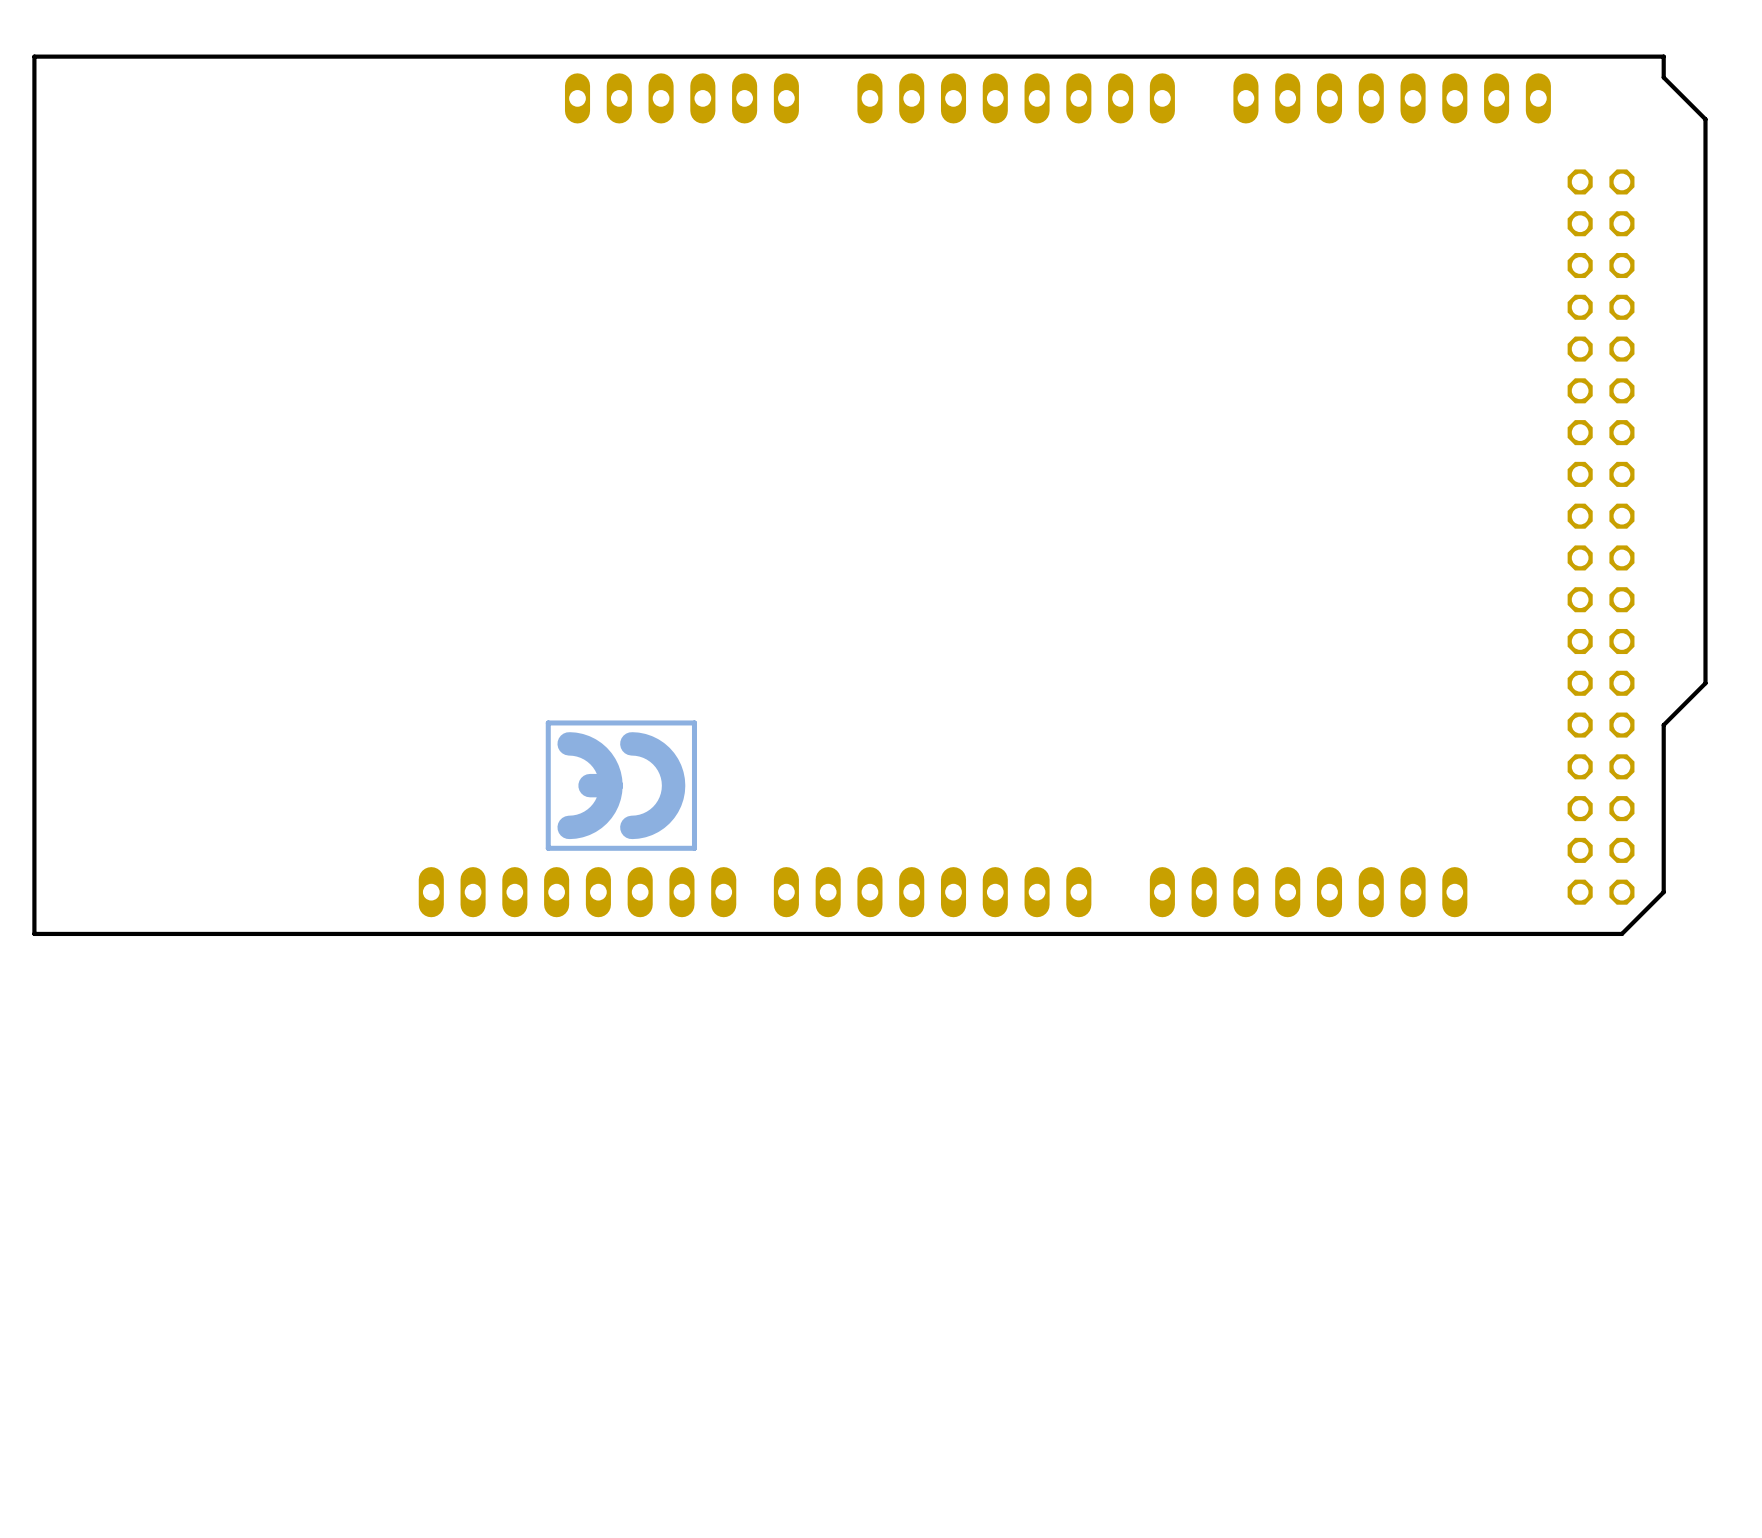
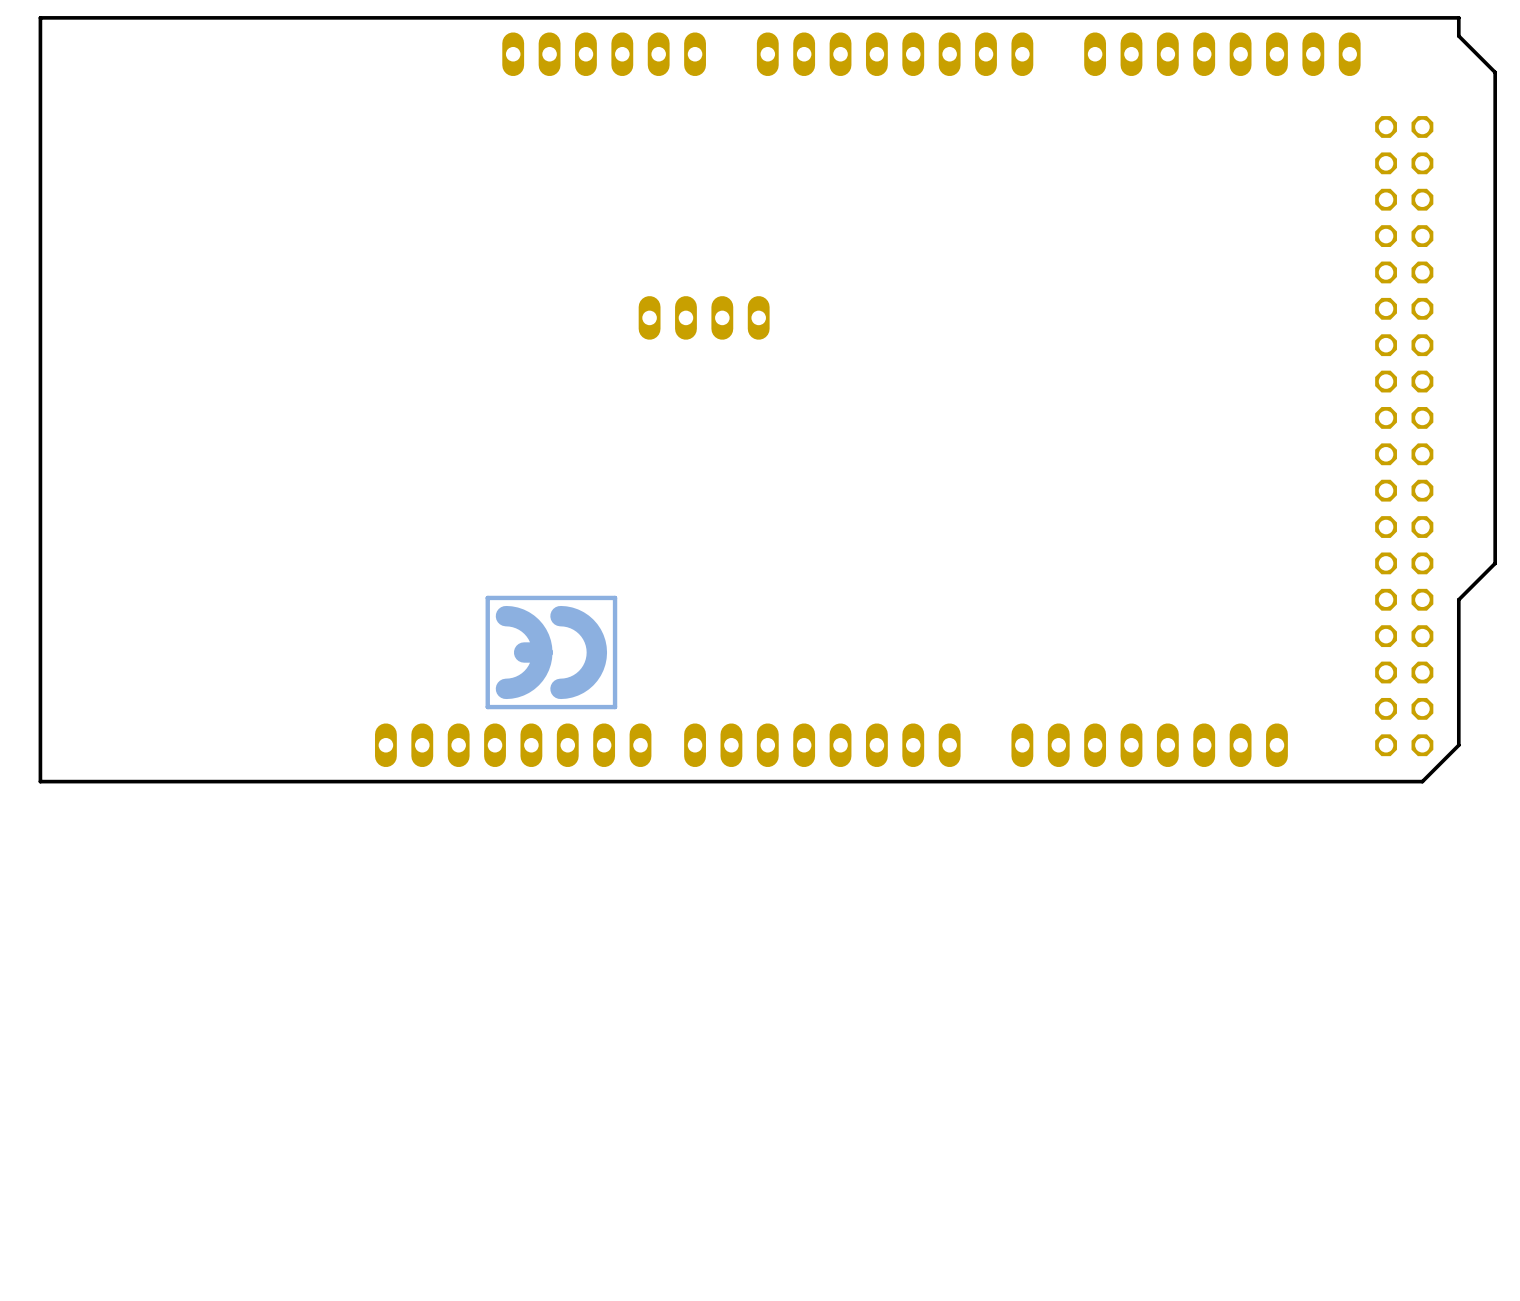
part: none -> (704, 317)

